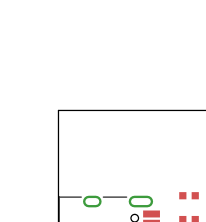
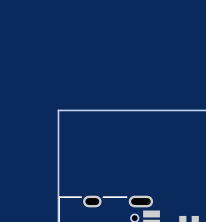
part: (189, 195) -> none

